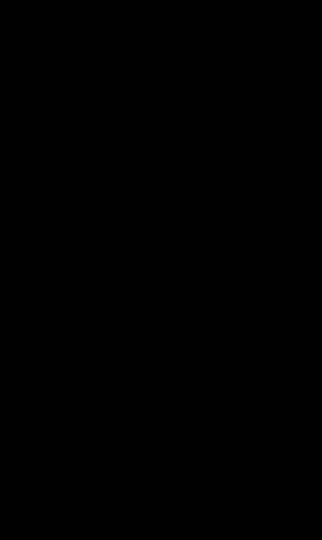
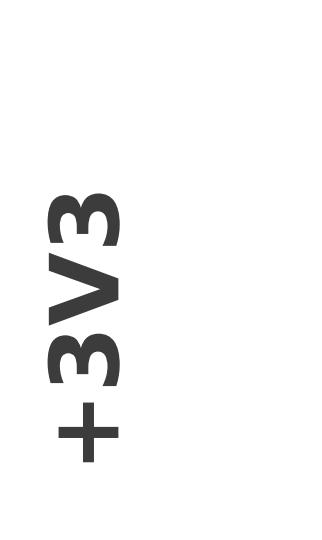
text: none -> +3V3 (83, 327)

